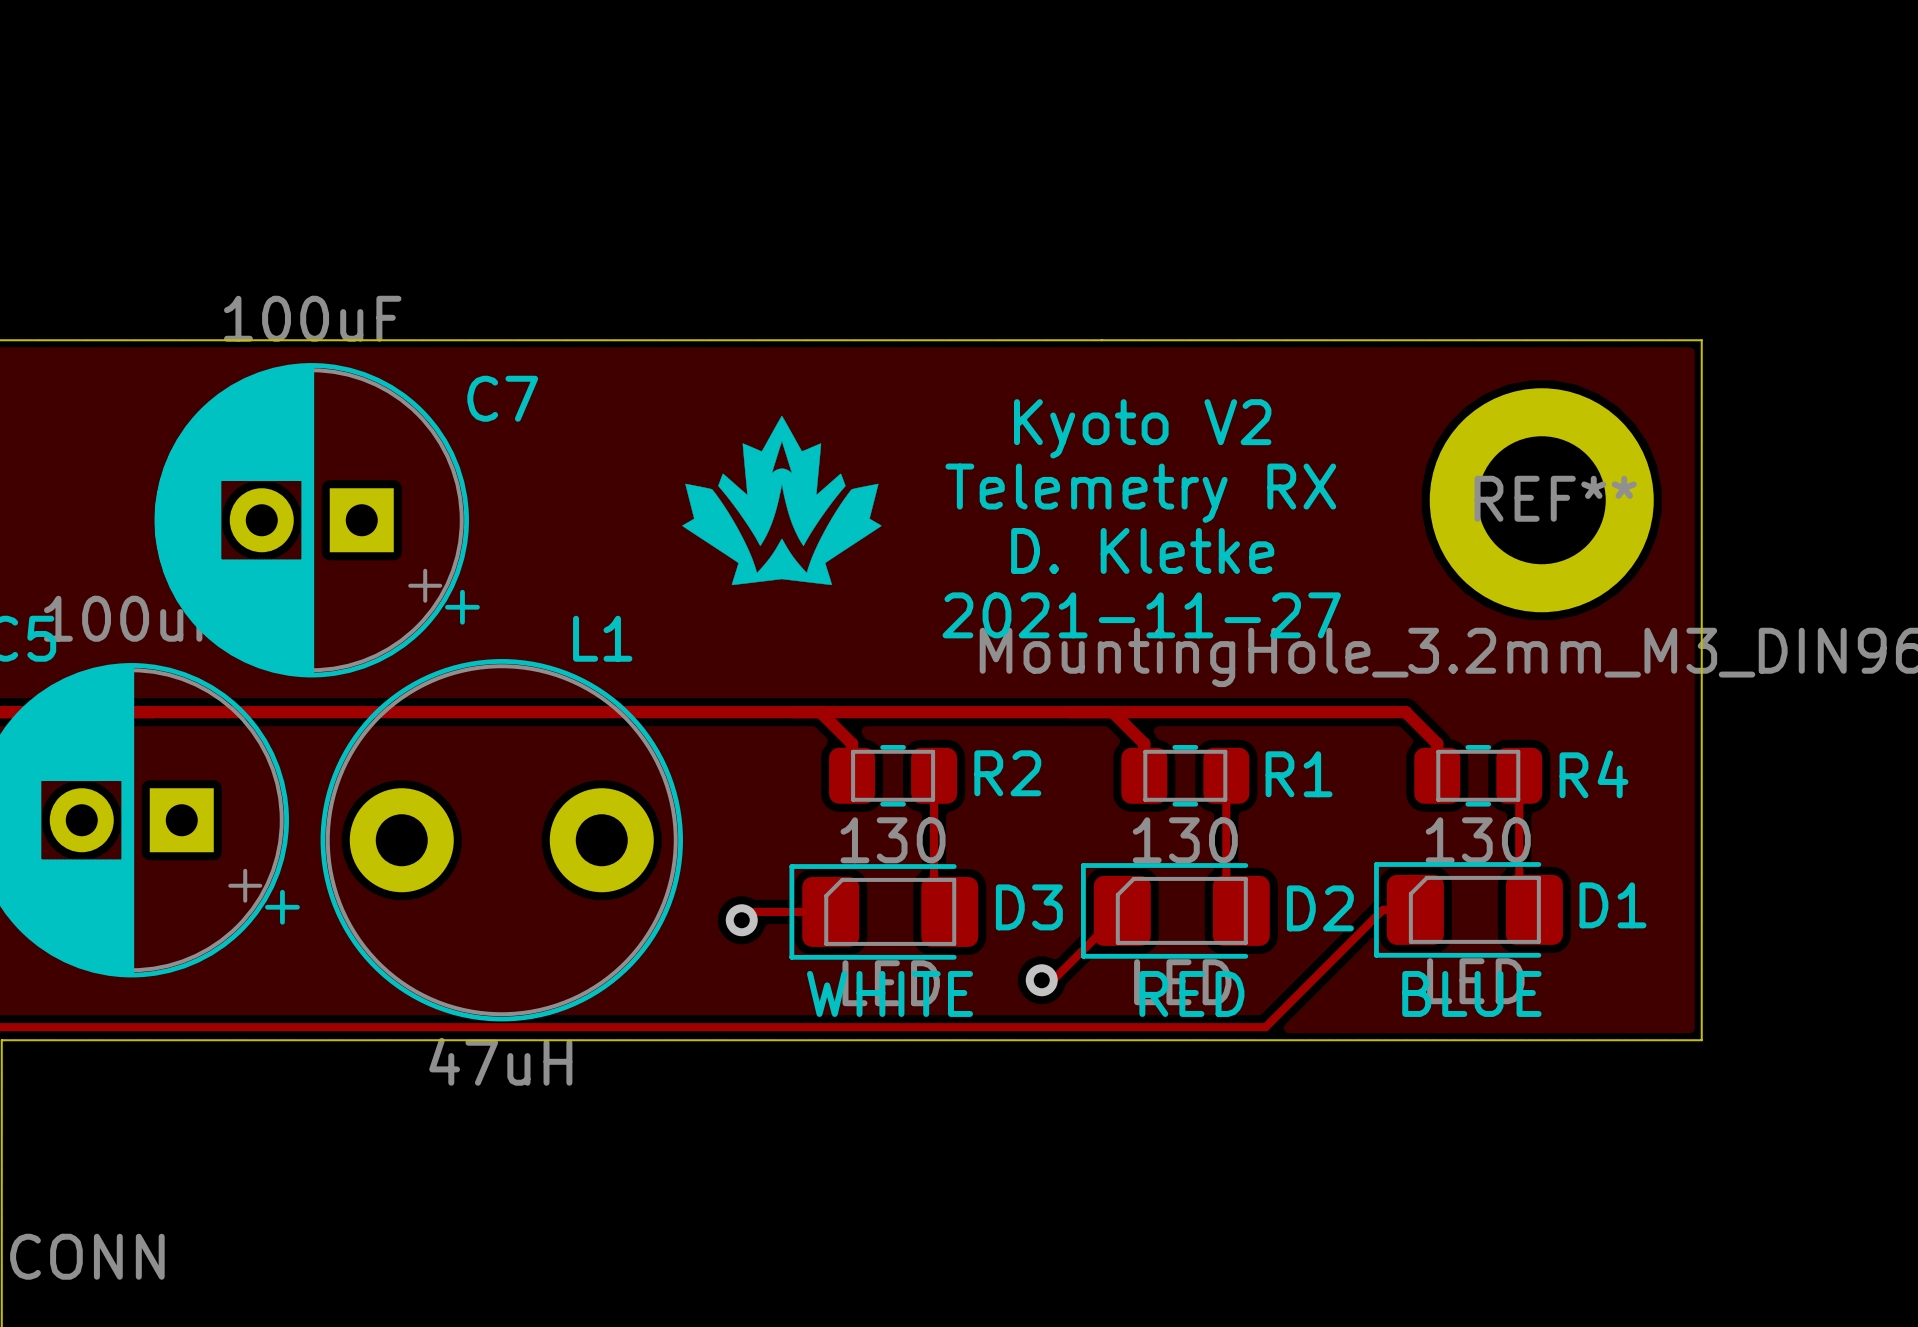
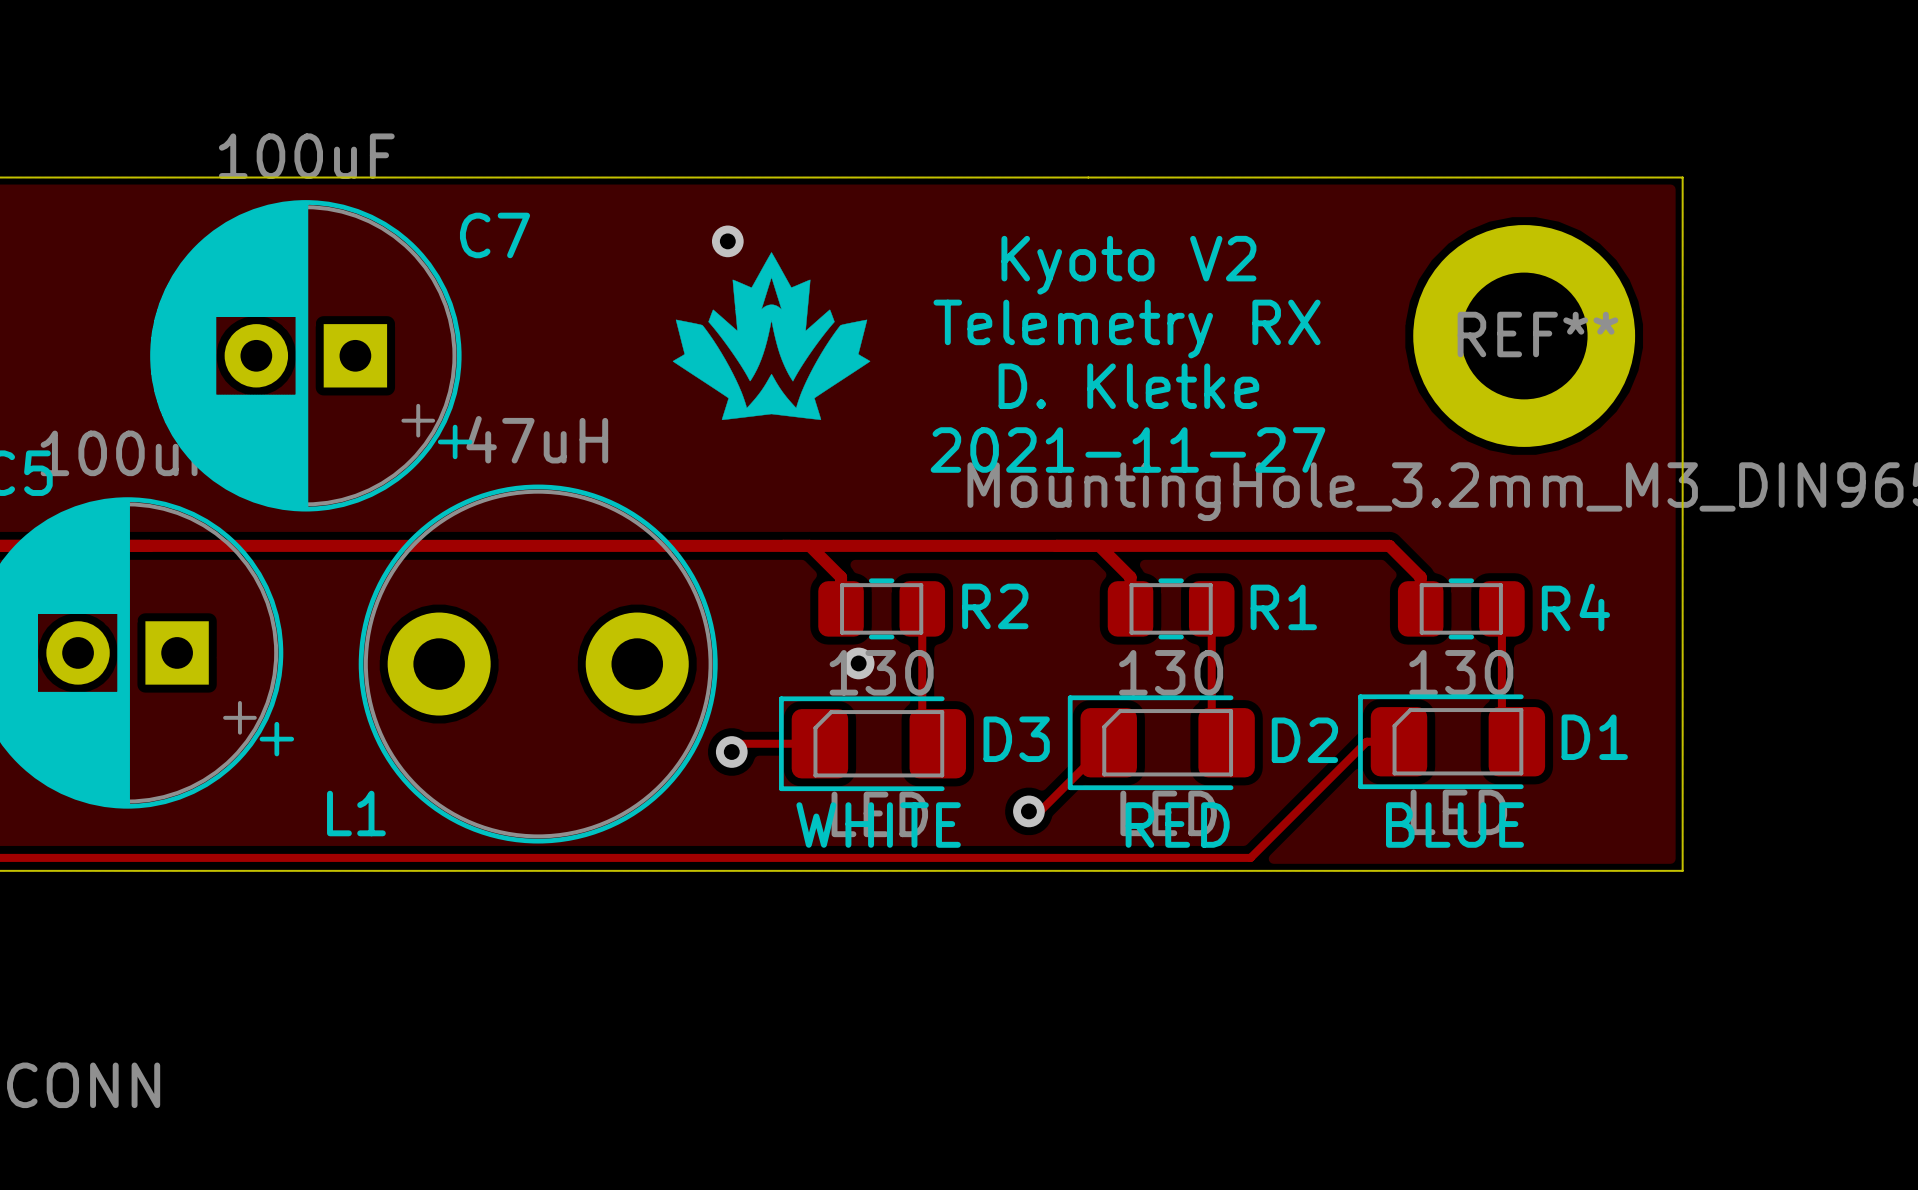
via: none -> (727, 241)
L1 name position: L1 (602, 638) -> L1 (356, 813)
via: none -> (858, 663)
L1 position: (501, 840) -> (538, 664)
L1 value position: 47uH (500, 1061) -> 47uH (537, 439)

